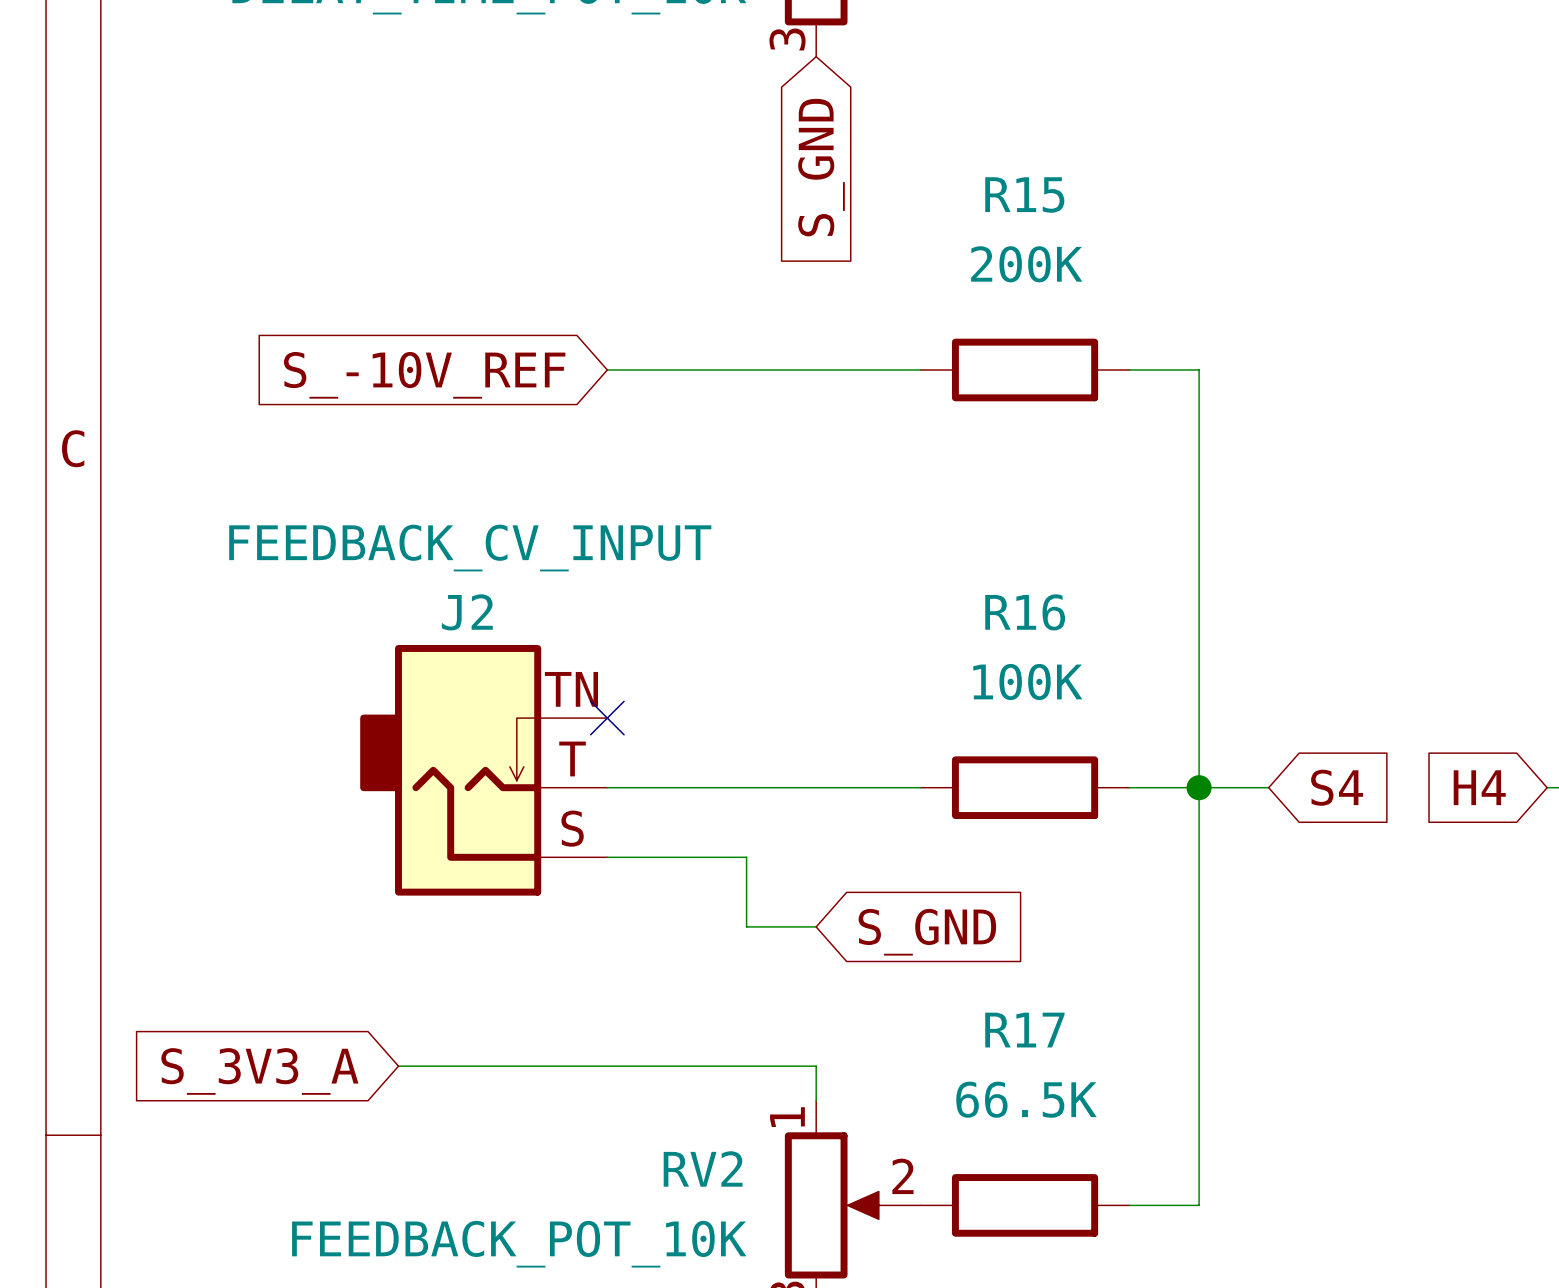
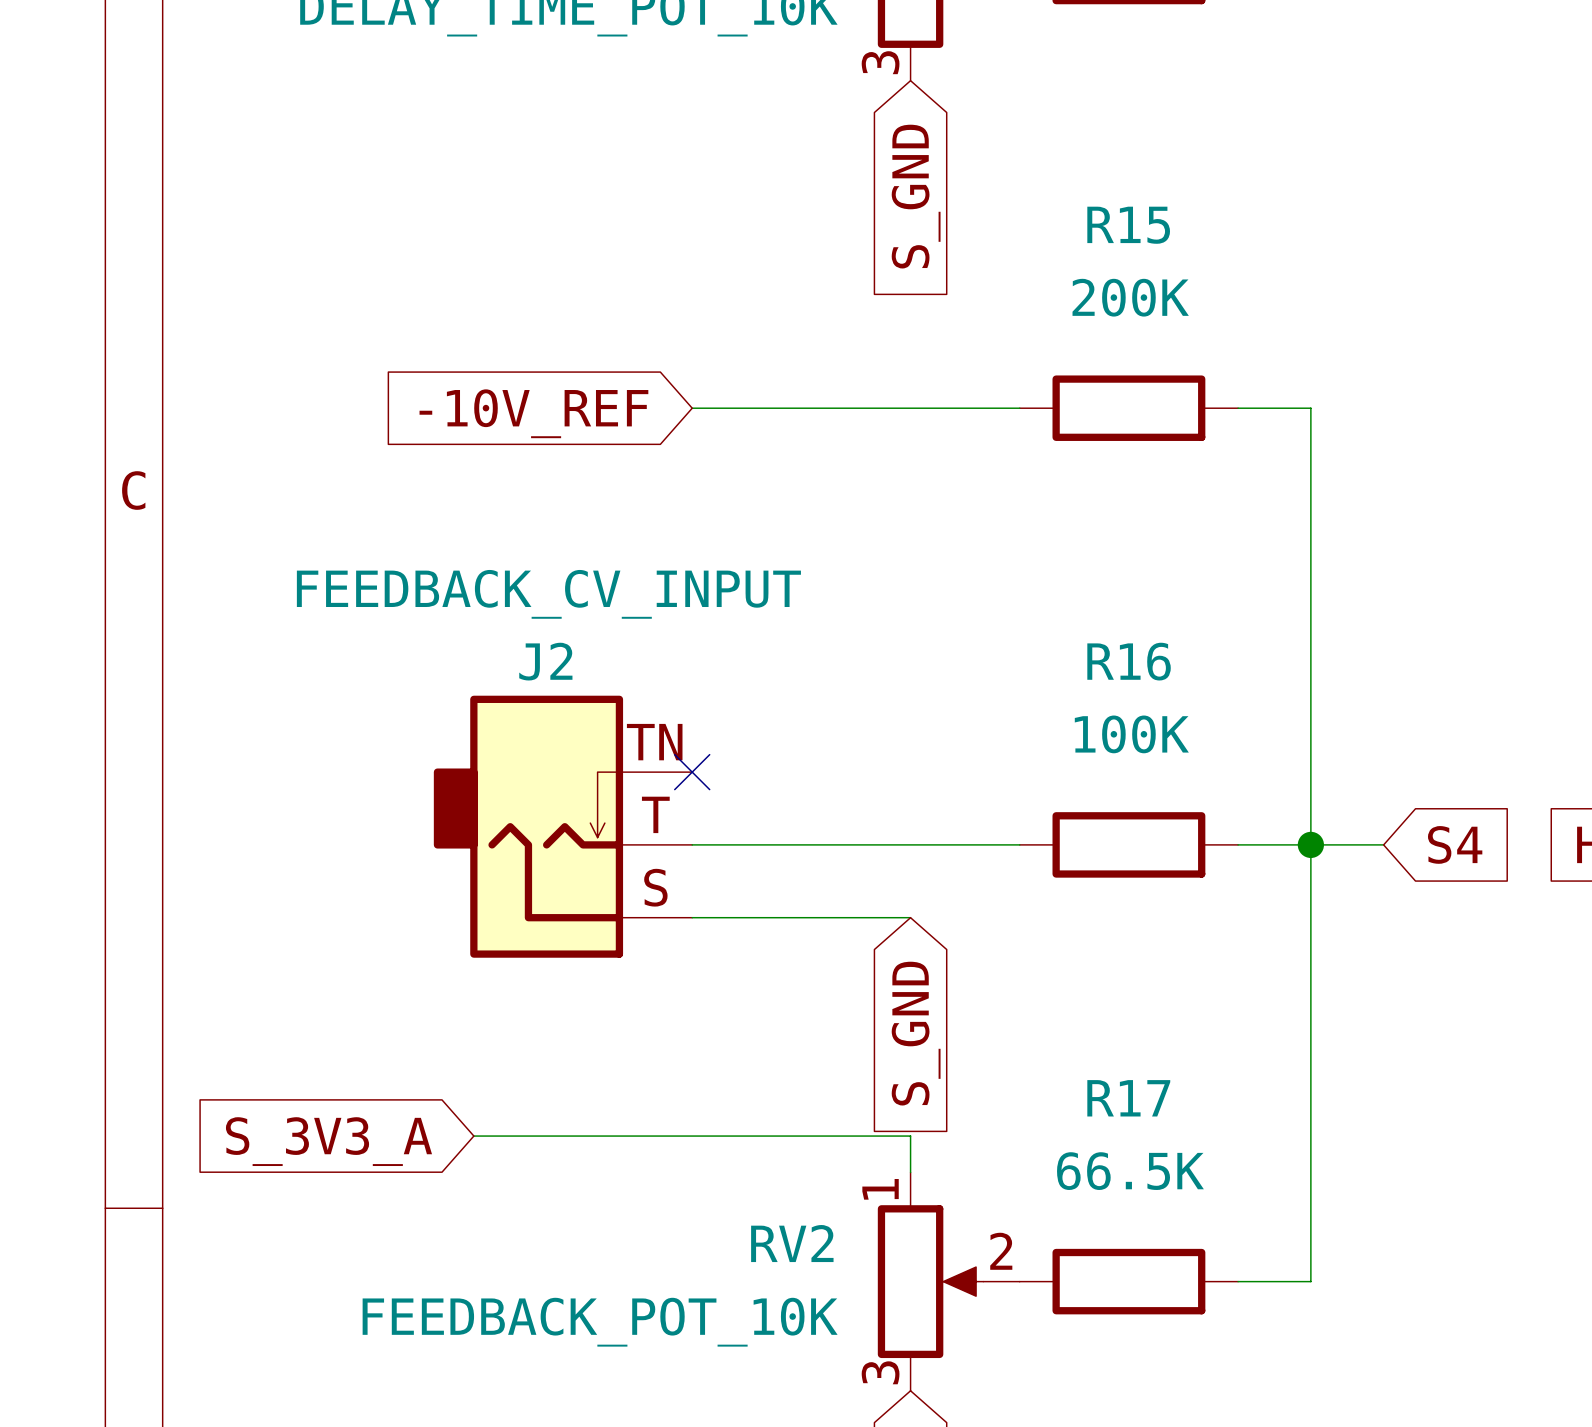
global label: S_-10V_REF (424, 375) -> -10V_REF (533, 413)
wire: (746, 857) (746, 926) (816, 926) -> (837, 917) (910, 917)
global label rotation: 0° (927, 932) -> 90° clockwise (916, 1033)

